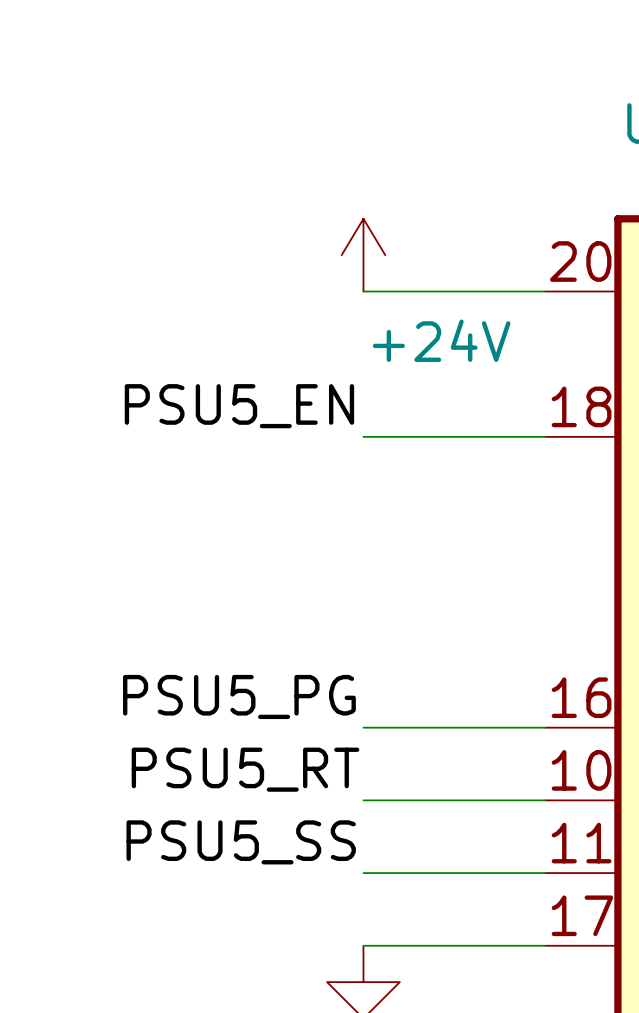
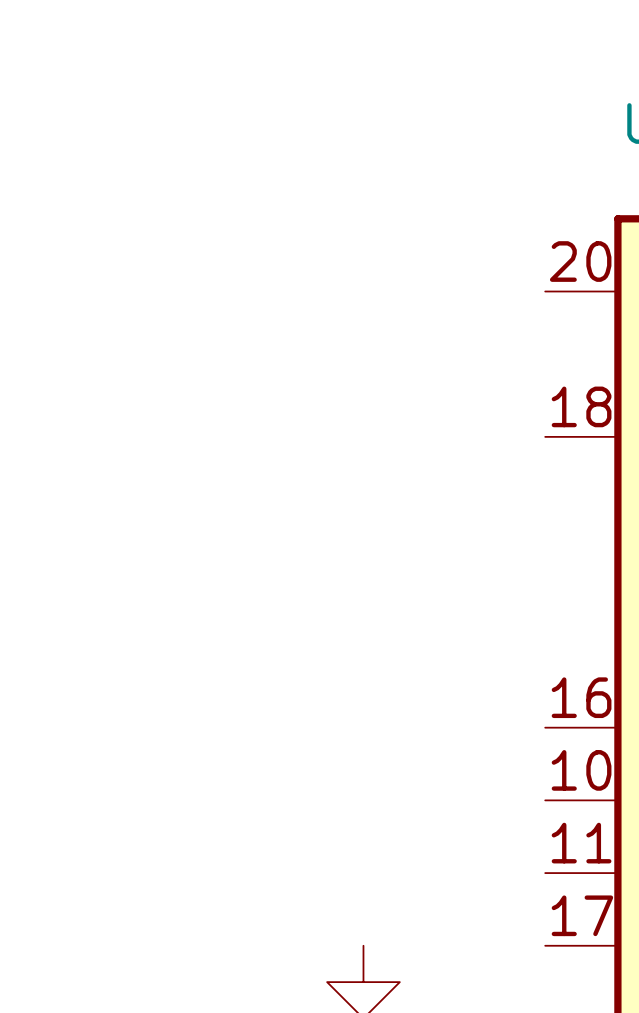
power symbol: +24V (363, 255) -> none
wire: (363, 291) (545, 291) -> none
label: PSU5_EN (239, 406) -> none
wire: (363, 436) (545, 436) -> none
label: PSU5_PG (239, 696) -> none
wire: (363, 727) (545, 727) -> none
label: PSU5_RT (245, 769) -> none
wire: (363, 800) (545, 800) -> none
label: PSU5_SS (241, 842) -> none
wire: (363, 873) (545, 873) -> none
wire: (363, 945) (545, 945) -> none

